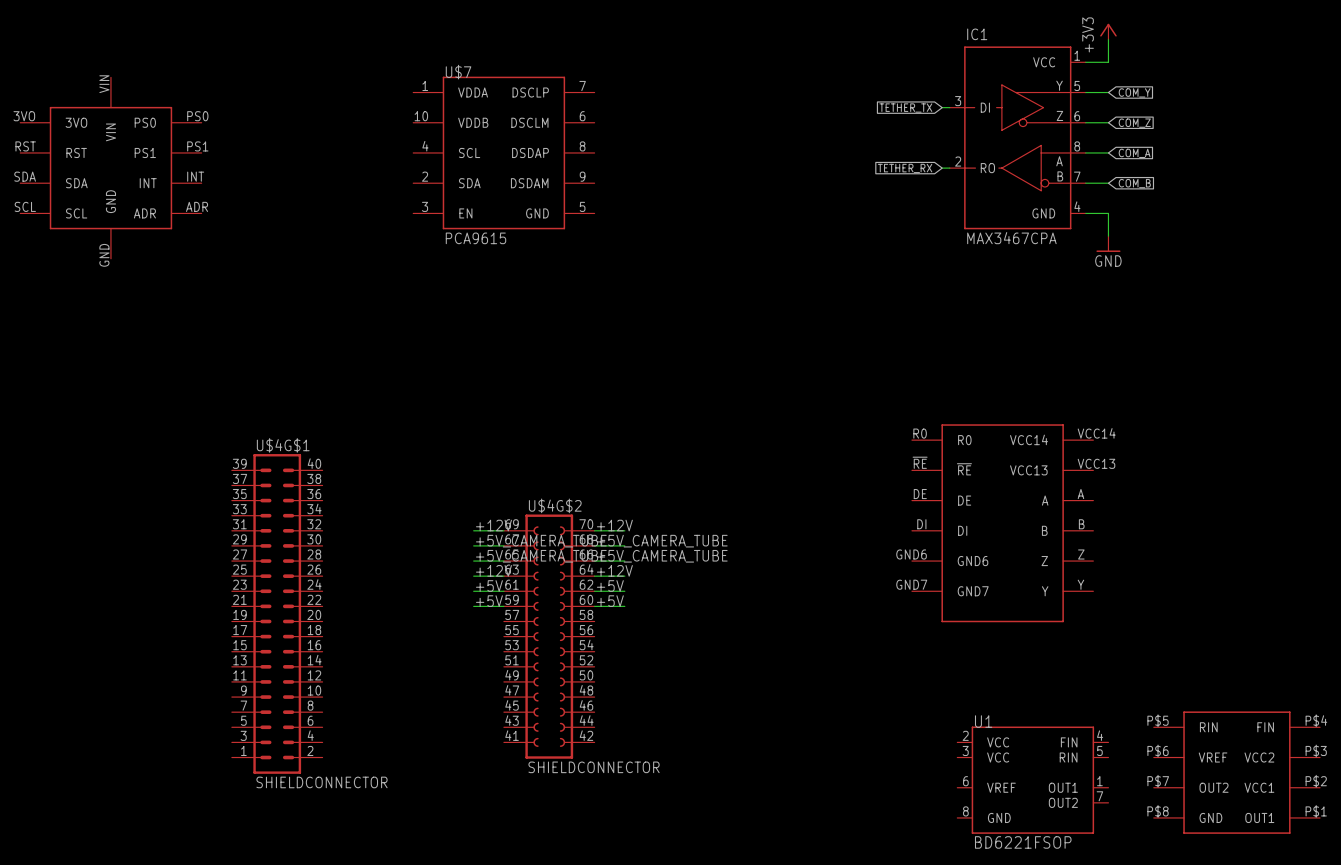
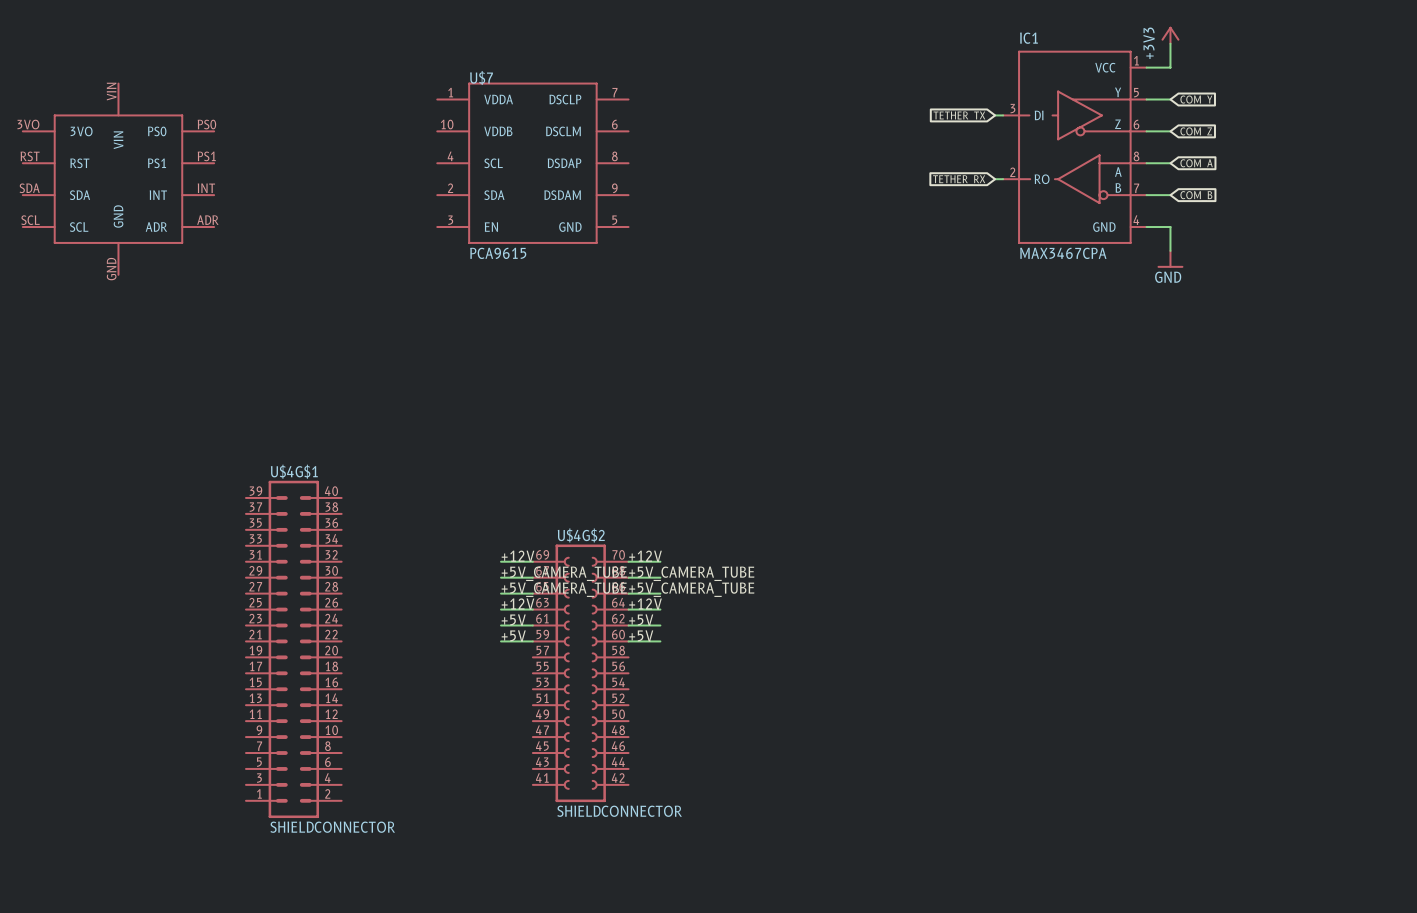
part: (1002, 523) -> none
part: (1236, 772) -> none
U1: BD6221FSOP (1032, 780) -> none

